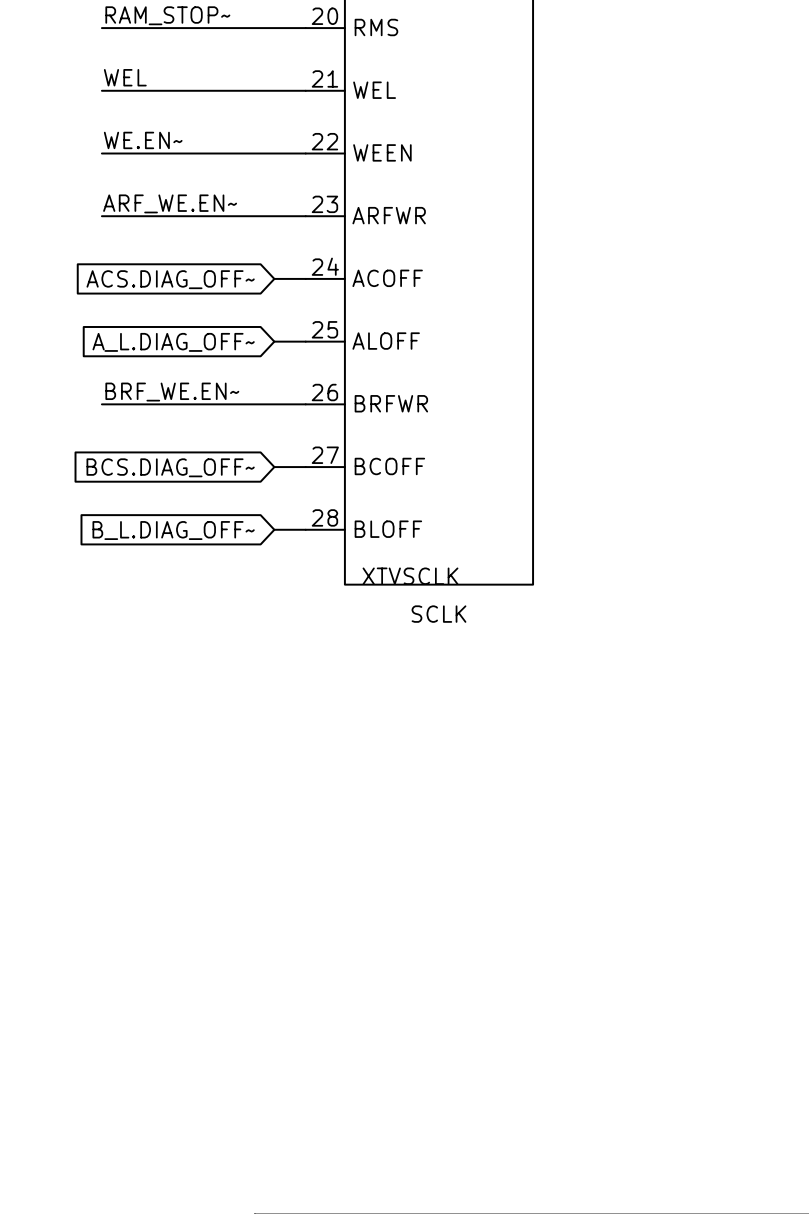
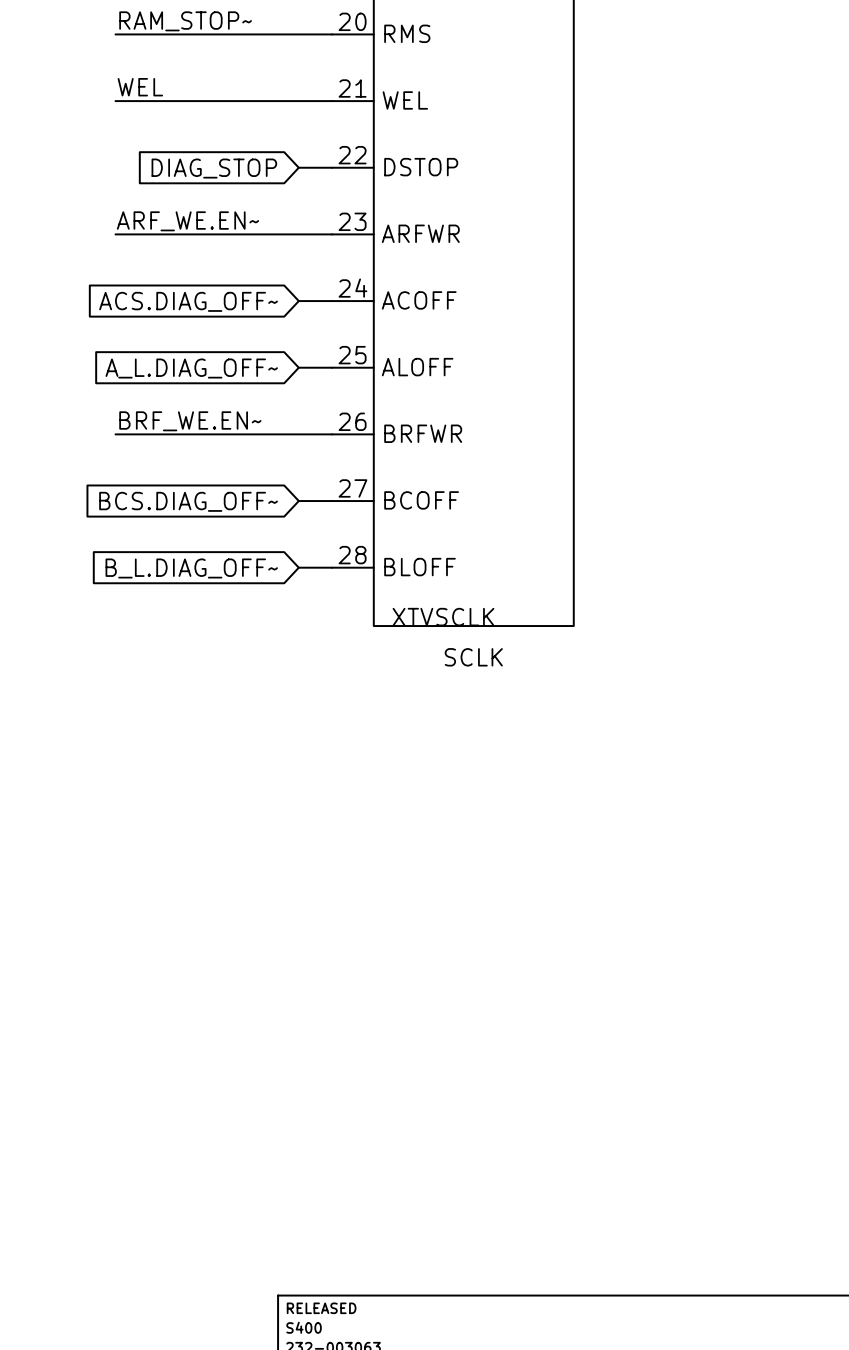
label: WE.EN~ (143, 140) -> none
part pin name: WEEN (382, 152) -> DSTOP (421, 167)
wire: (101, 153) (274, 153) -> none
global label: none -> DIAG_STOP (214, 168)

